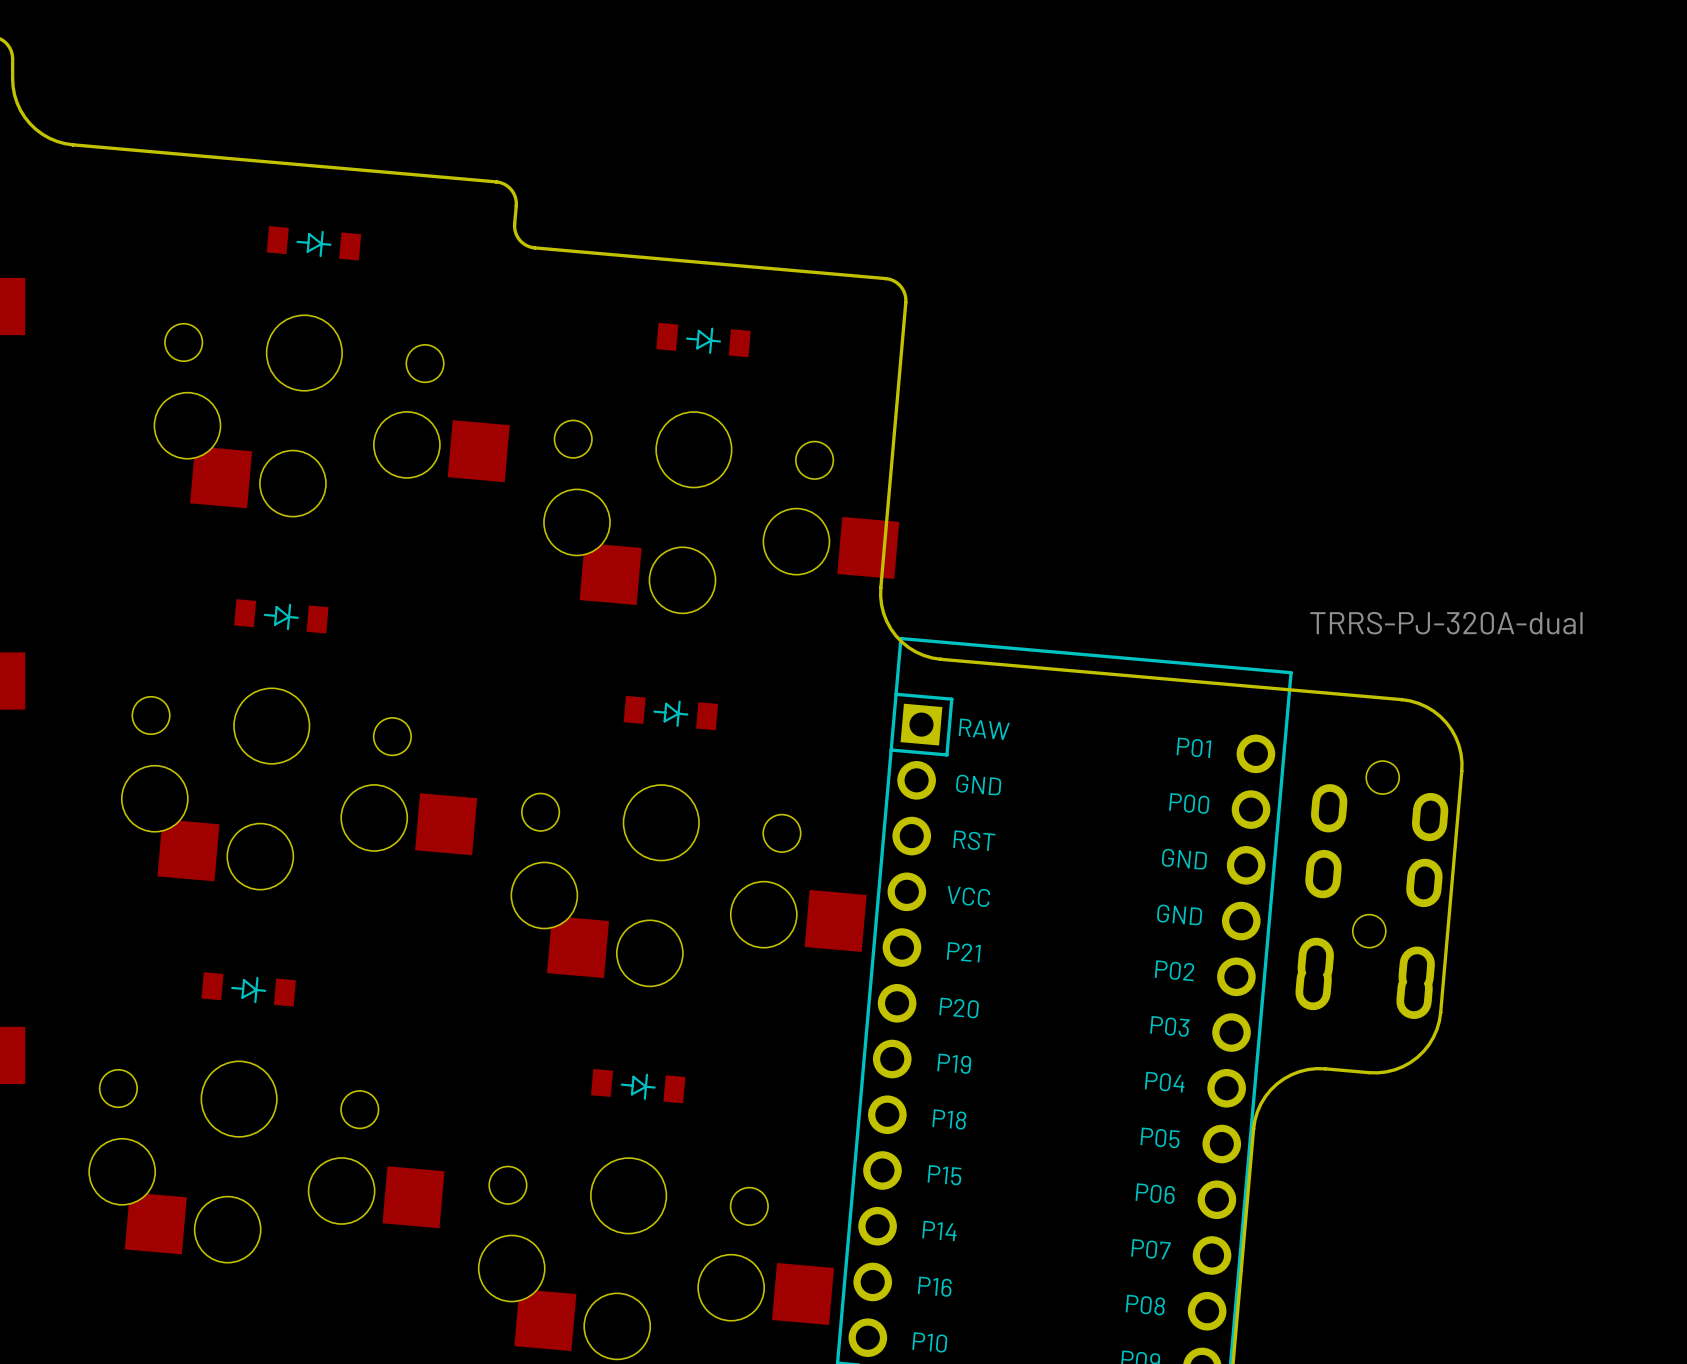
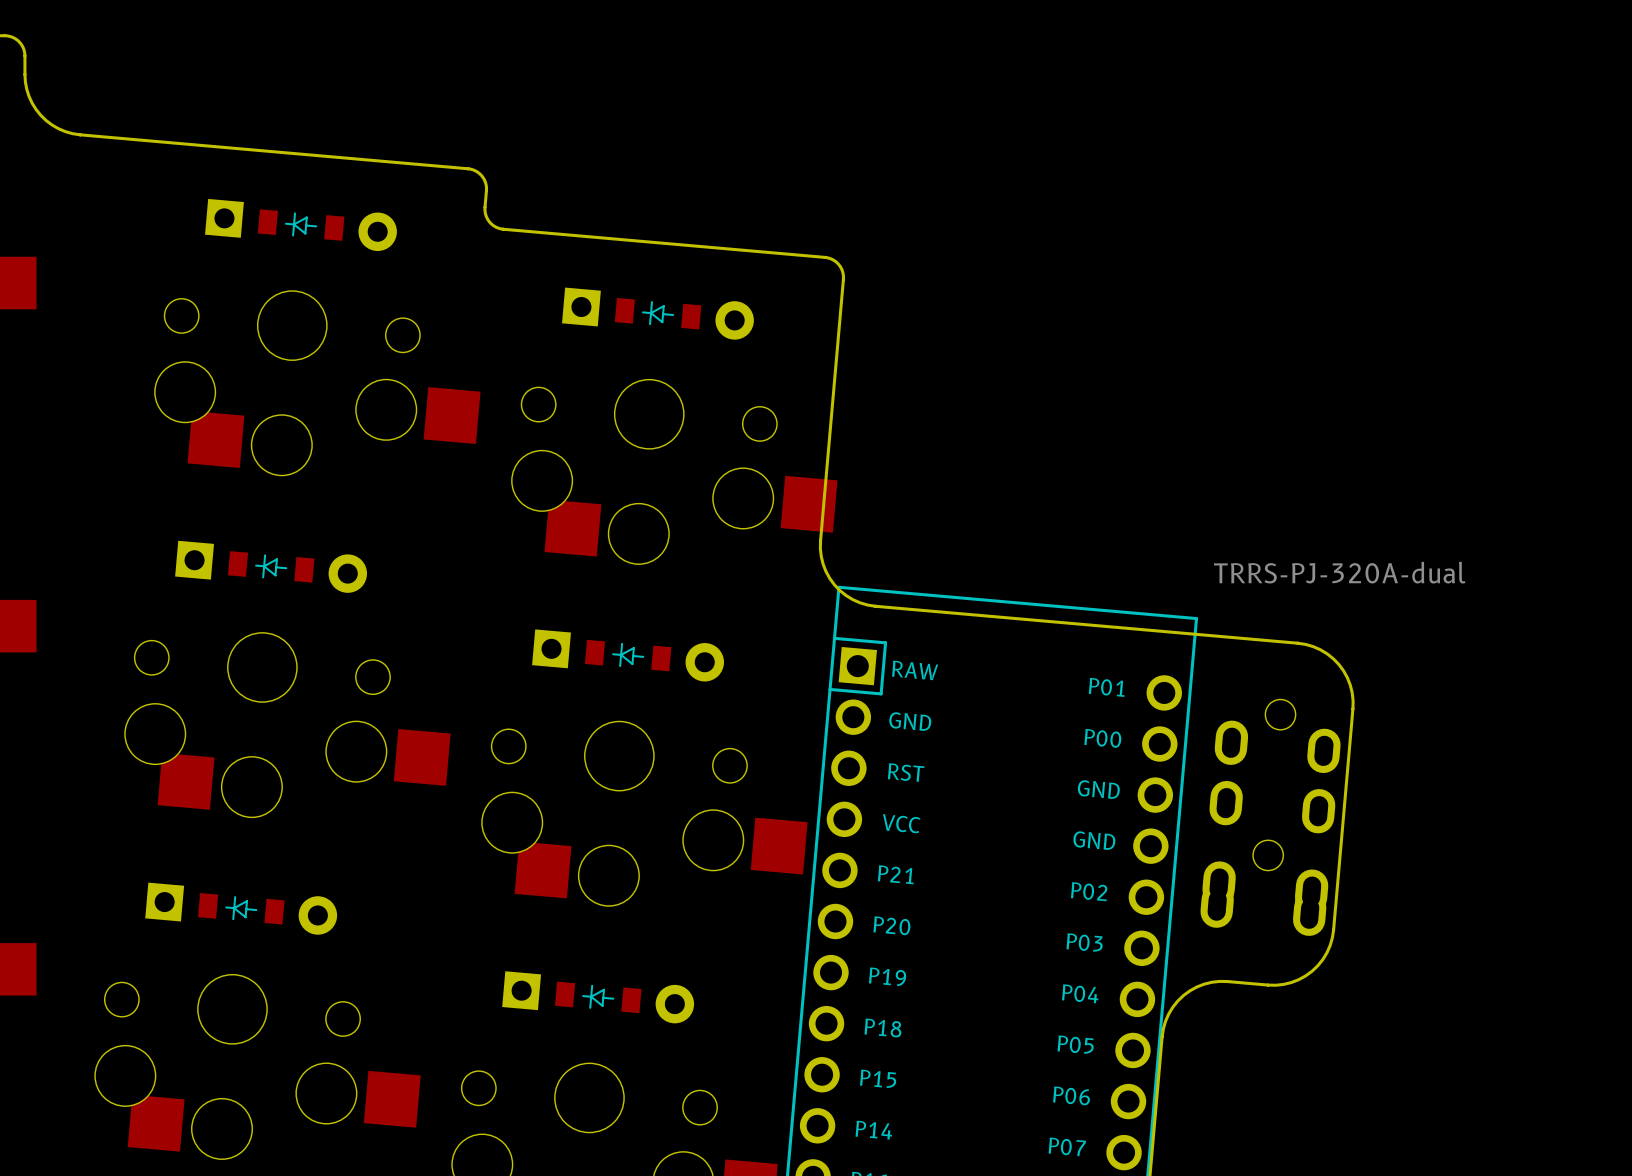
part footprint: [266, 226, 362, 261] -> [205, 198, 397, 252]
part footprint: [656, 322, 751, 358] -> [562, 287, 754, 340]
part footprint: [234, 599, 329, 634] -> [175, 540, 368, 593]
part footprint: [623, 695, 719, 731] -> [532, 629, 724, 682]
part footprint: [201, 972, 296, 1007] -> [145, 882, 338, 935]
part footprint: [591, 1068, 686, 1104] -> [502, 971, 695, 1024]

